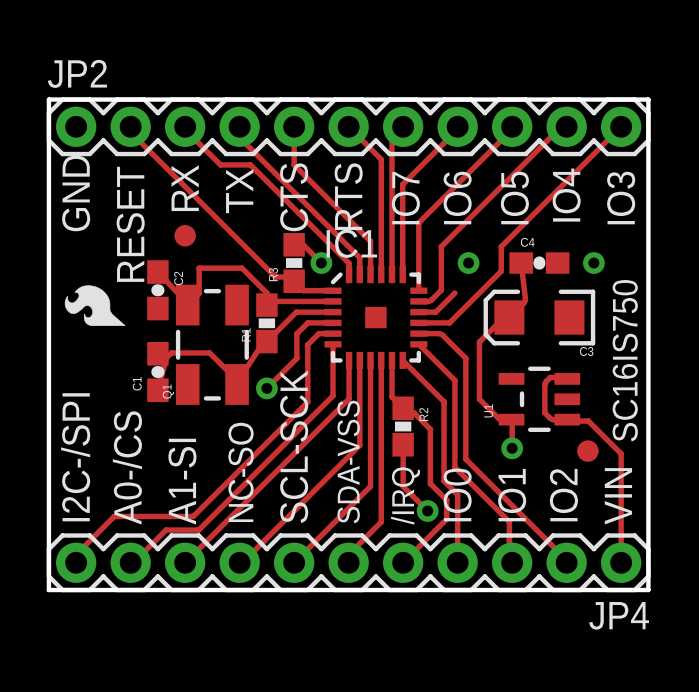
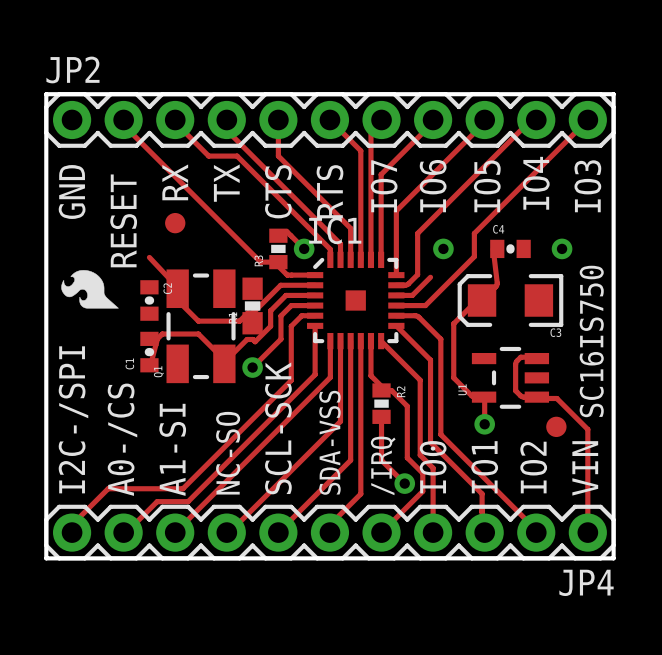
R3 footprint: [283, 232, 305, 294] -> [269, 228, 288, 270]
C4 footprint: [509, 252, 570, 274] -> [490, 239, 531, 259]
C2 footprint: [147, 260, 169, 321] -> [140, 280, 159, 321]
track: (296, 301) (270, 301) (266, 305) -> (280, 285) (252, 313)
track: (187, 305) (199, 293) (199, 268) (242, 268) (266, 293) (266, 307) (263, 311) -> none
track: (302, 312) (296, 312) (266, 341) (266, 336) (268, 334) (236, 382) -> (286, 295) (270, 310) (270, 326) (255, 341) (252, 339) (247, 339) (224, 362)
track: none -> (177, 300) (198, 321) (239, 321) (247, 313) (252, 313)
C1 footprint: [147, 341, 169, 403] -> [140, 331, 159, 373]
R2 footprint: [392, 396, 414, 457] -> [372, 383, 391, 424]

